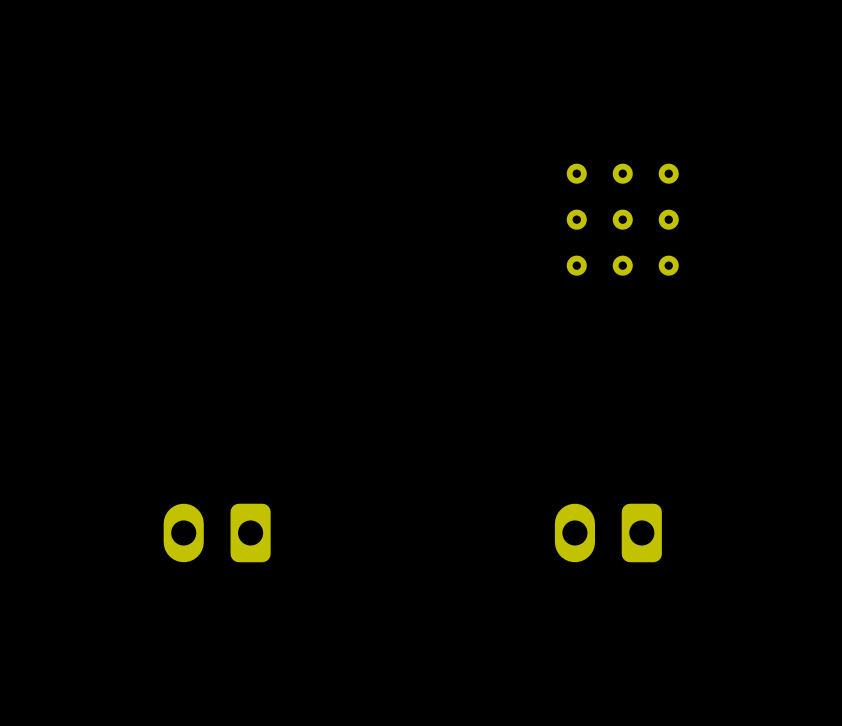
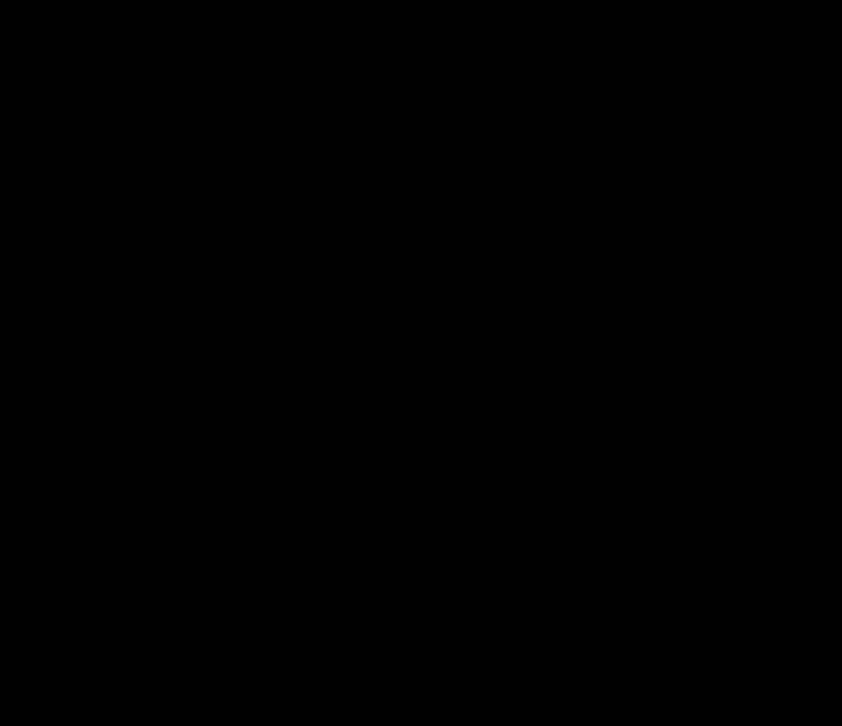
part: (622, 219) -> none
part: (217, 532) -> none
part: (608, 532) -> none

